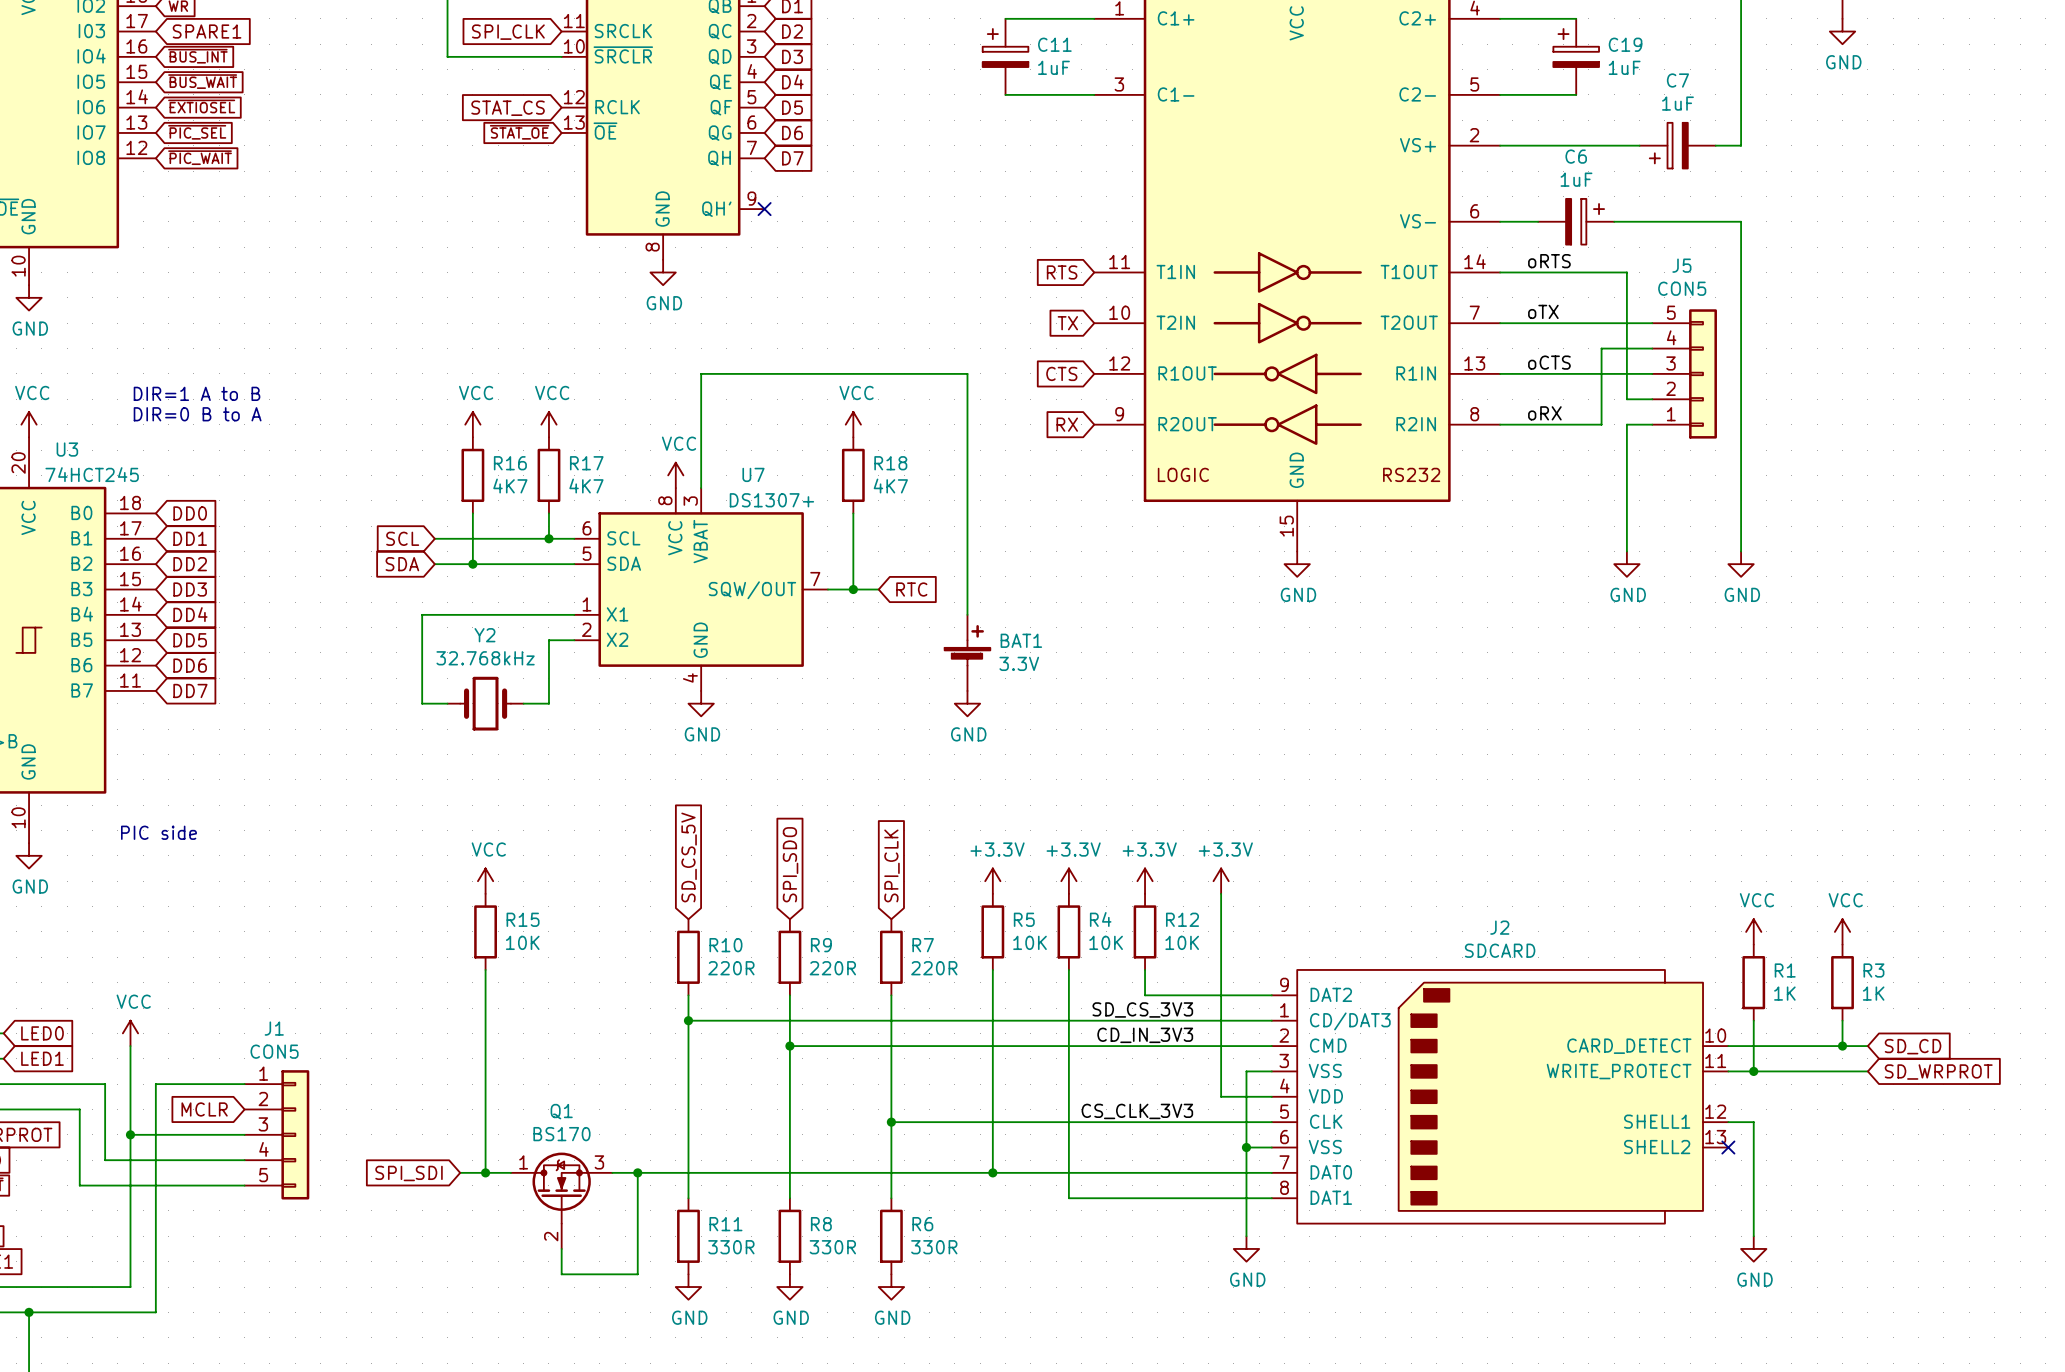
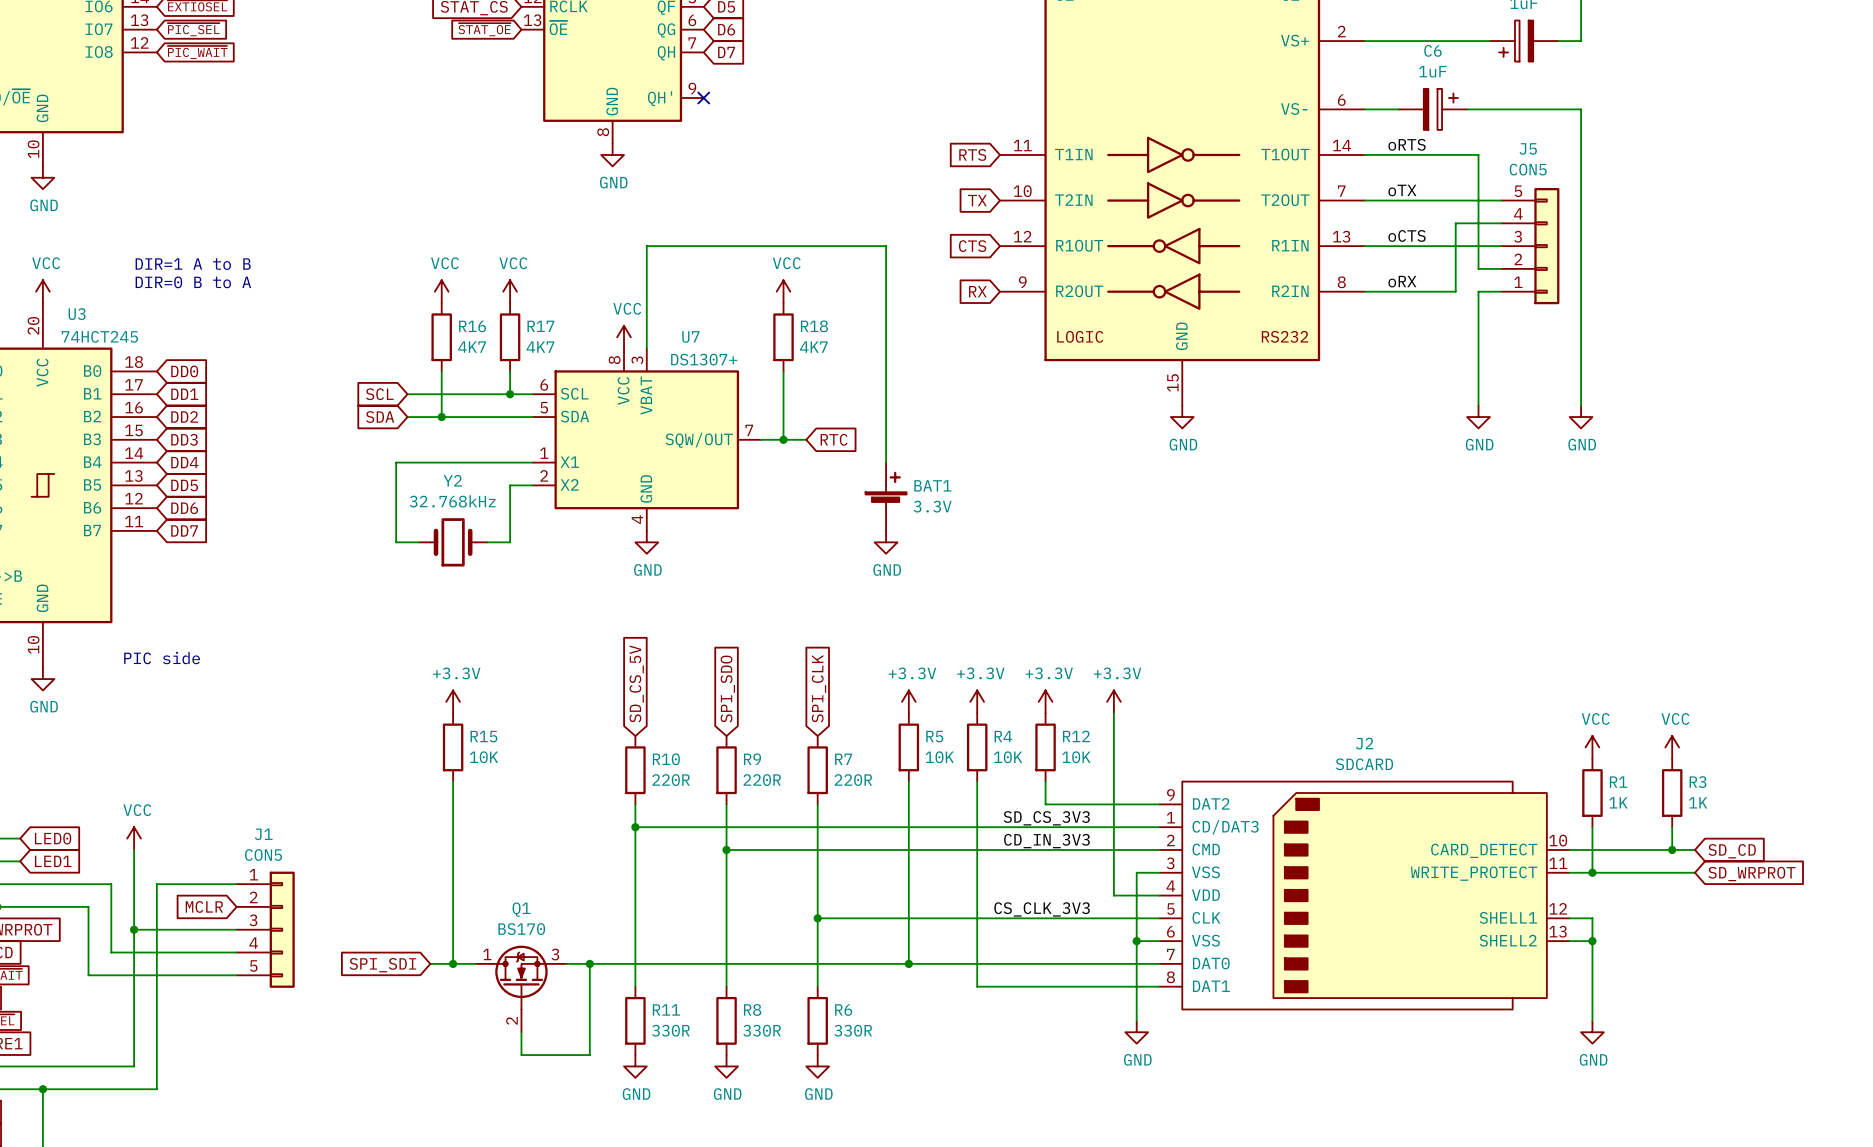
power symbol: VCC (485, 881) -> +3.3V (453, 701)
wire: none -> (1569, 941) (1592, 941)
no-connect mark: (1728, 1147) -> none
junction: none -> (1592, 941)

